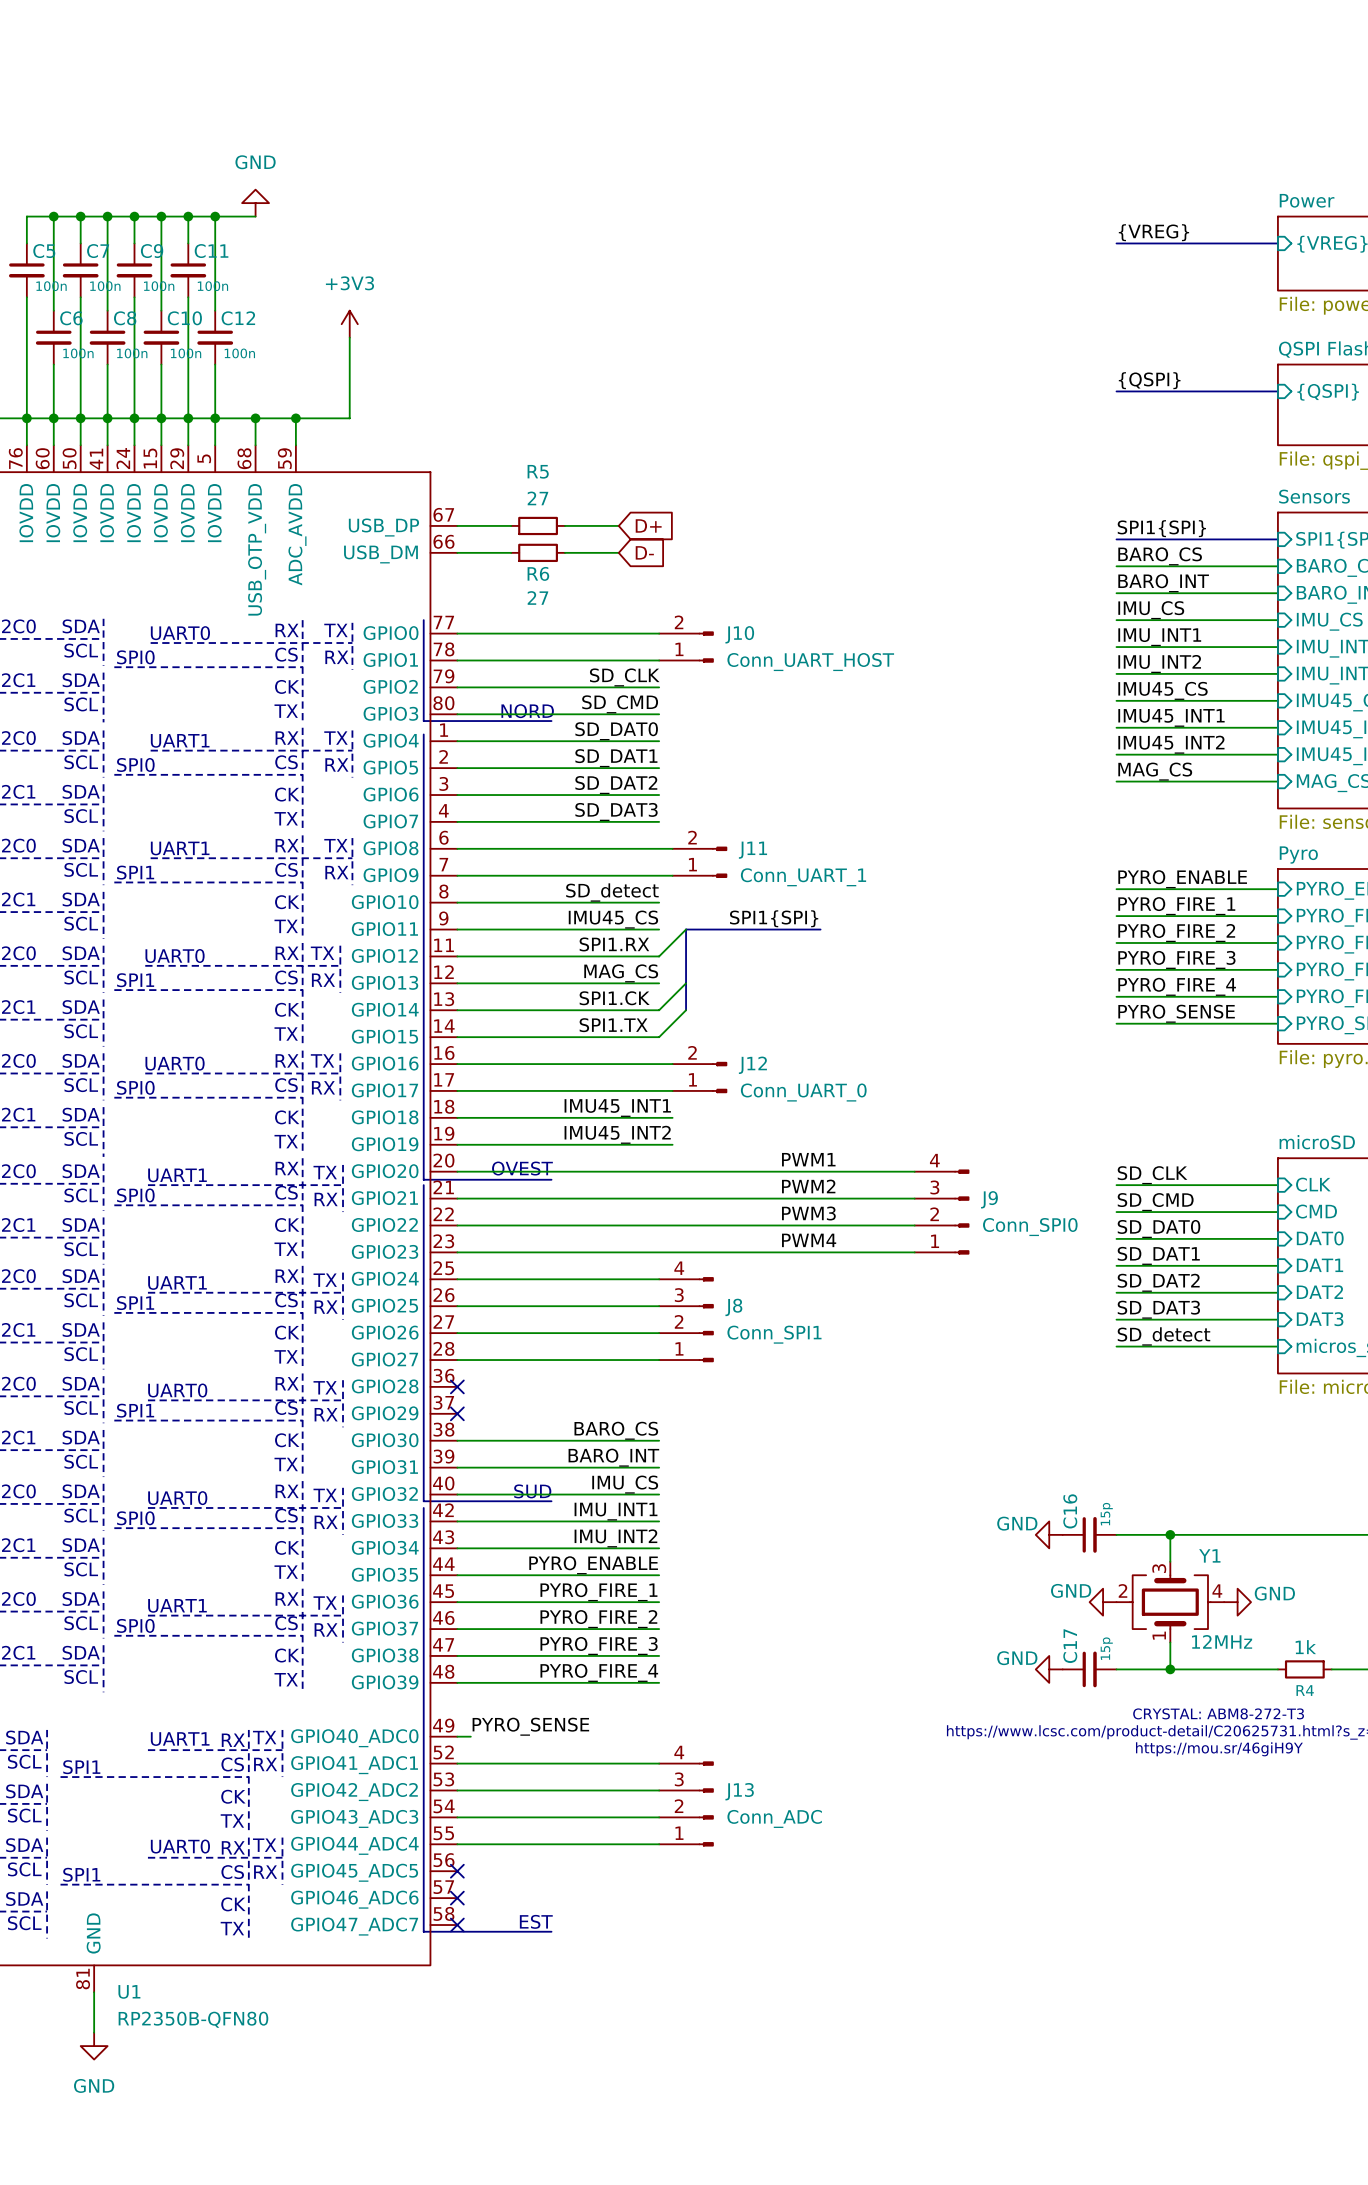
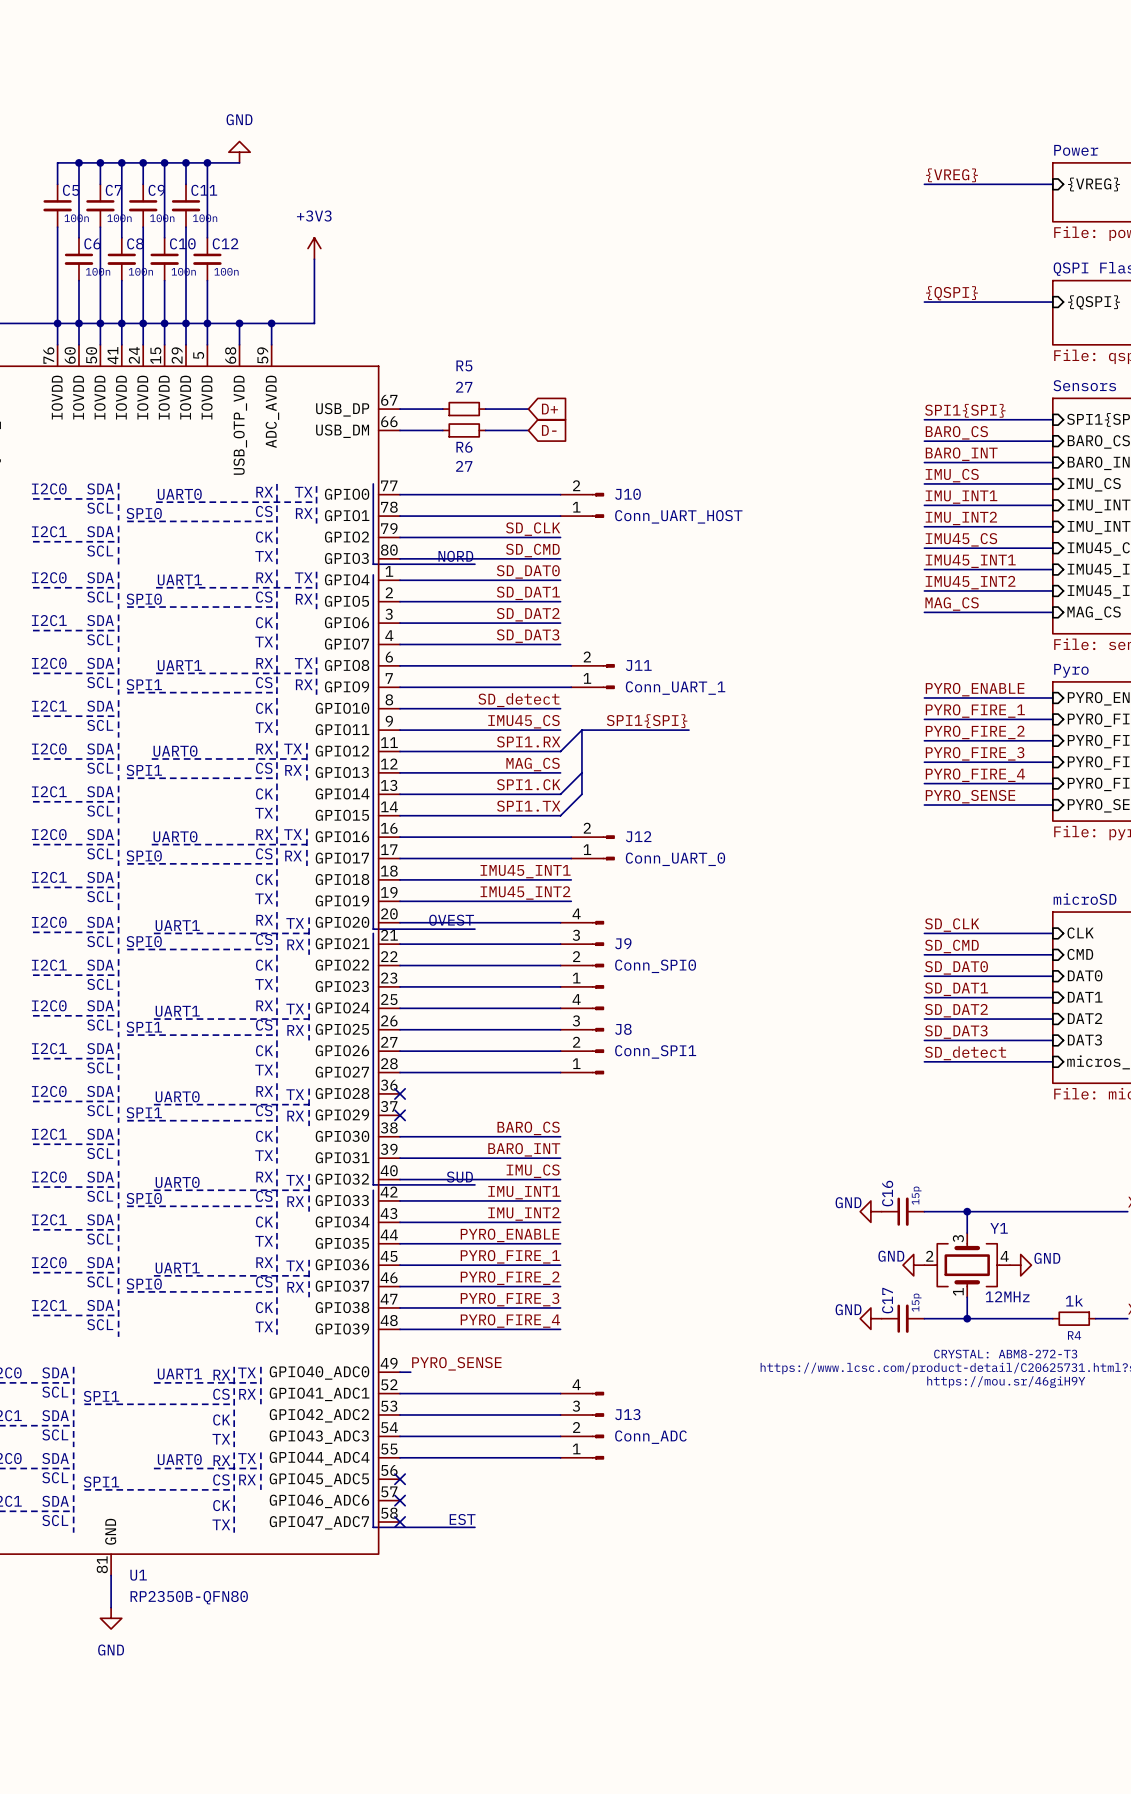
label: PWM1 (808, 1159) -> none
wire: (659, 1171) (914, 1171) -> none
label: PWM2 (808, 1186) -> none
wire: (659, 1198) (914, 1198) -> none
J9 position: (942, 1212) -> (582, 954)
label: PWM3 (808, 1213) -> none
wire: (659, 1225) (914, 1225) -> none
label: PWM4 (809, 1240) -> none
wire: (659, 1252) (914, 1252) -> none

